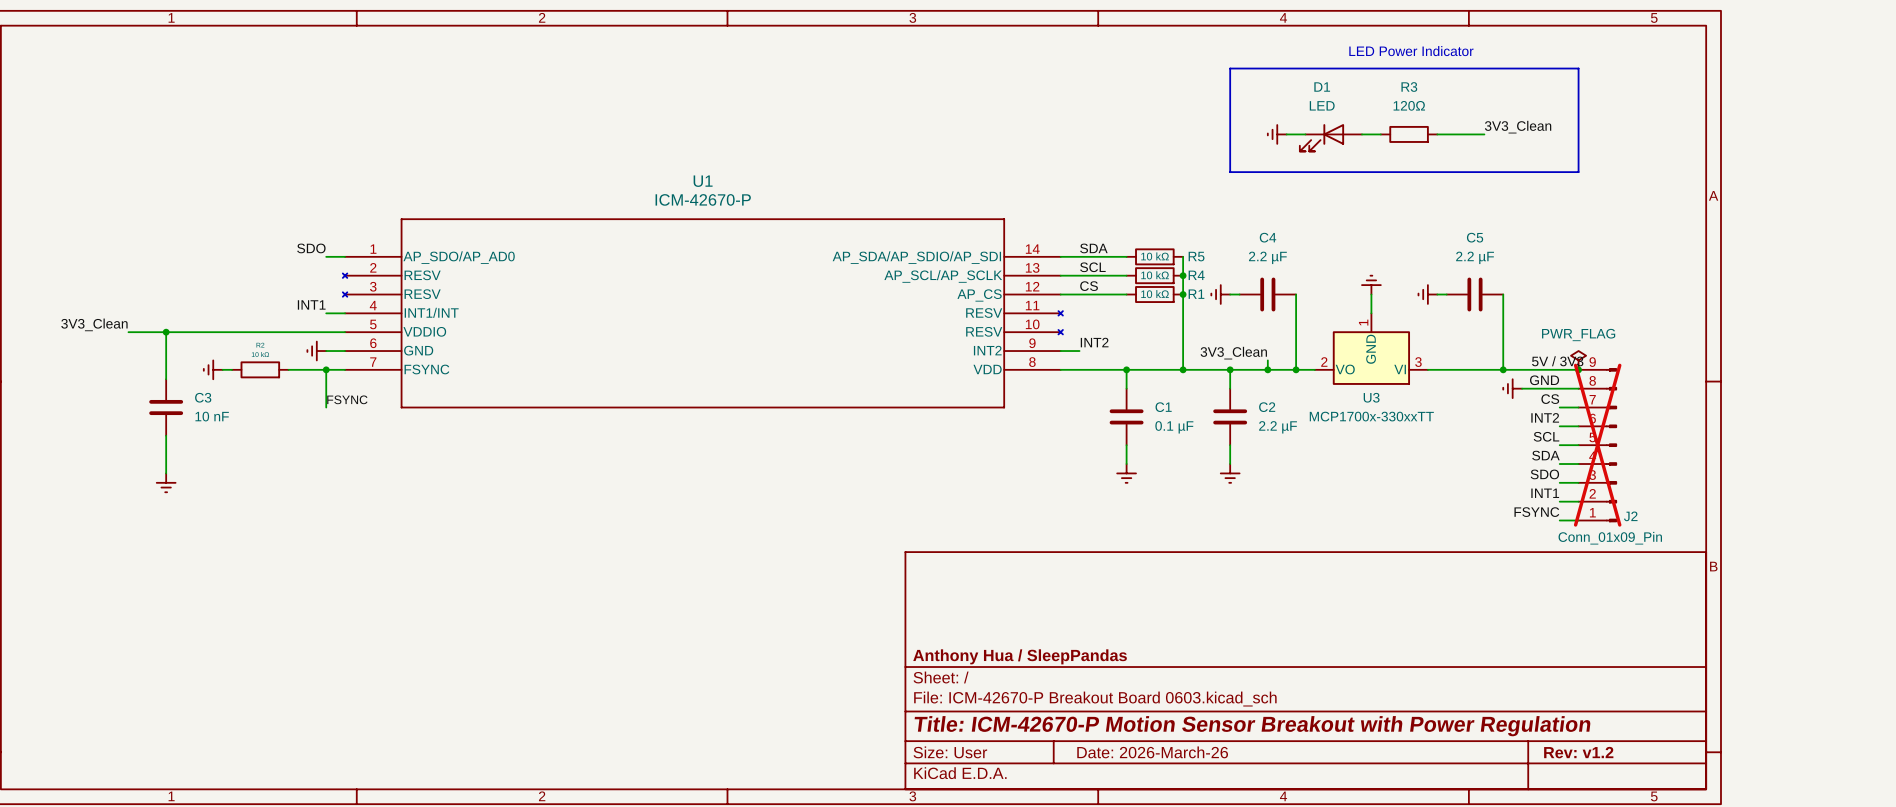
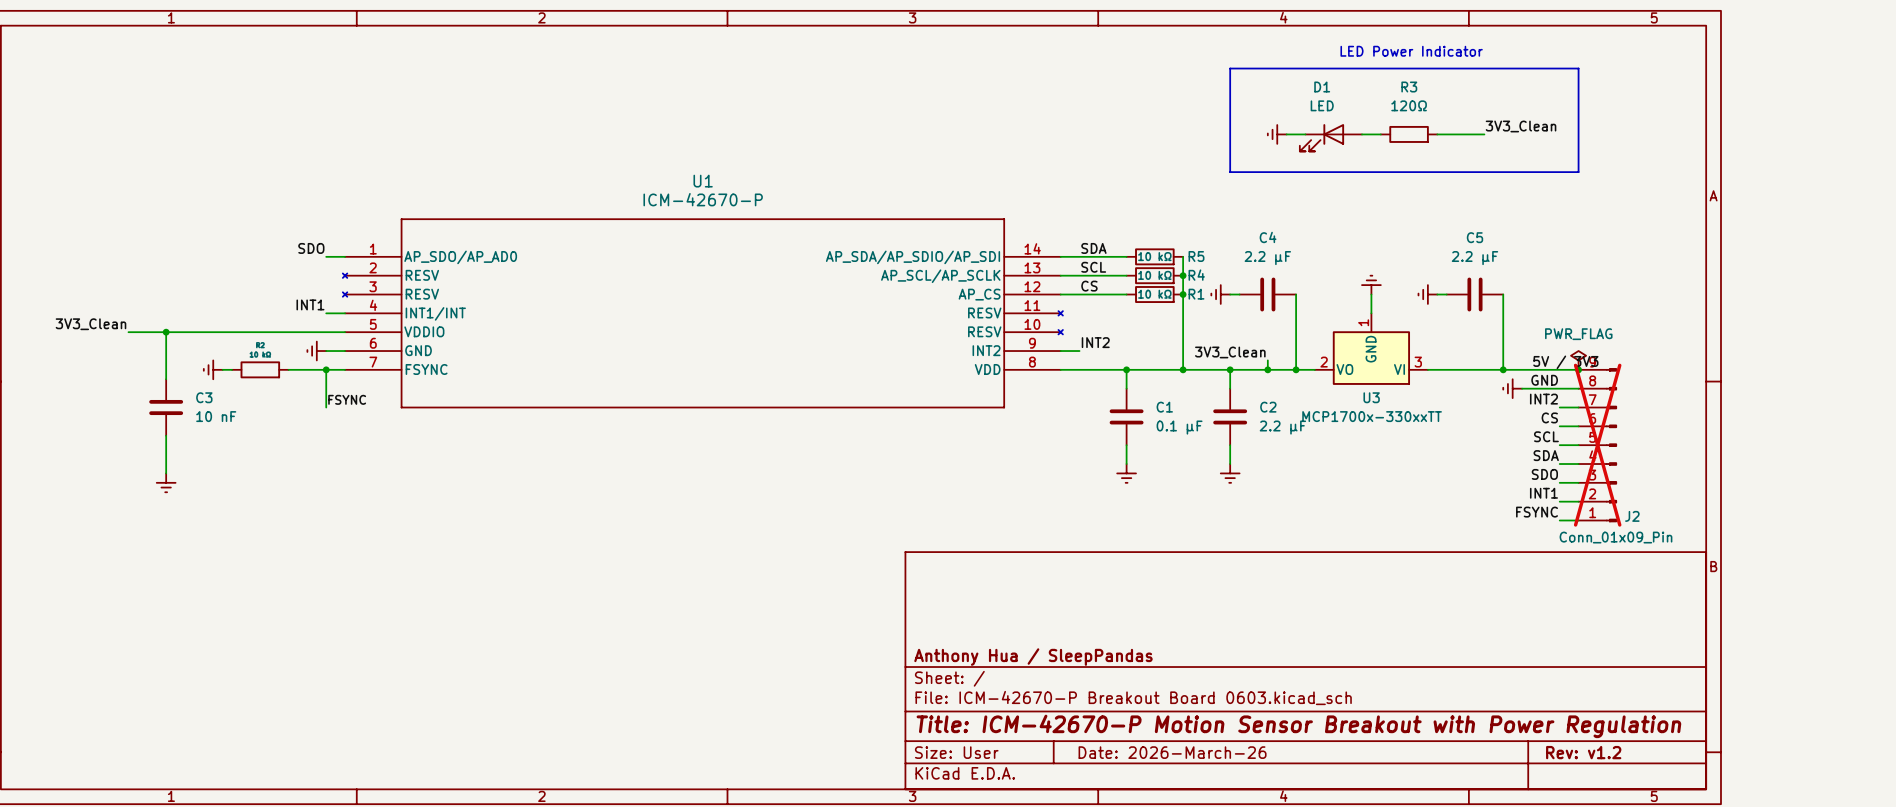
label: CS (1550, 399) -> INT2 (1543, 399)
label: INT2 (1545, 417) -> CS (1549, 417)

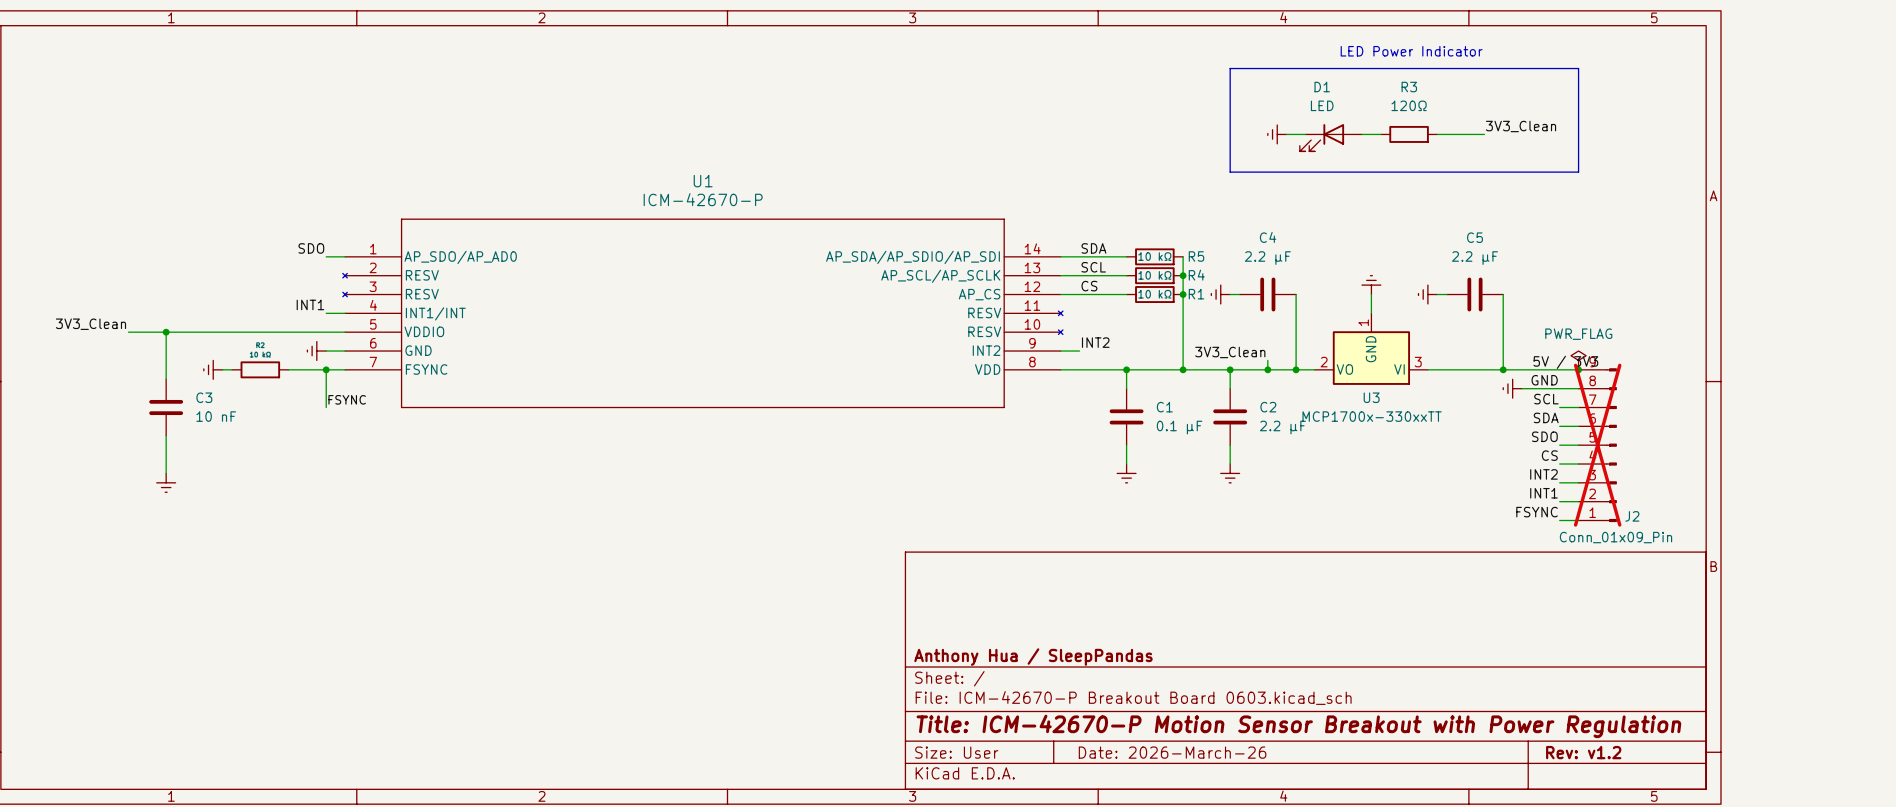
label: INT2 (1543, 399) -> SCL (1546, 399)
label: CS (1549, 417) -> SDA (1546, 417)
label: SCL (1546, 436) -> SDO (1544, 436)
label: SDA (1546, 455) -> CS (1549, 455)
label: SDO (1544, 474) -> INT2 (1543, 474)

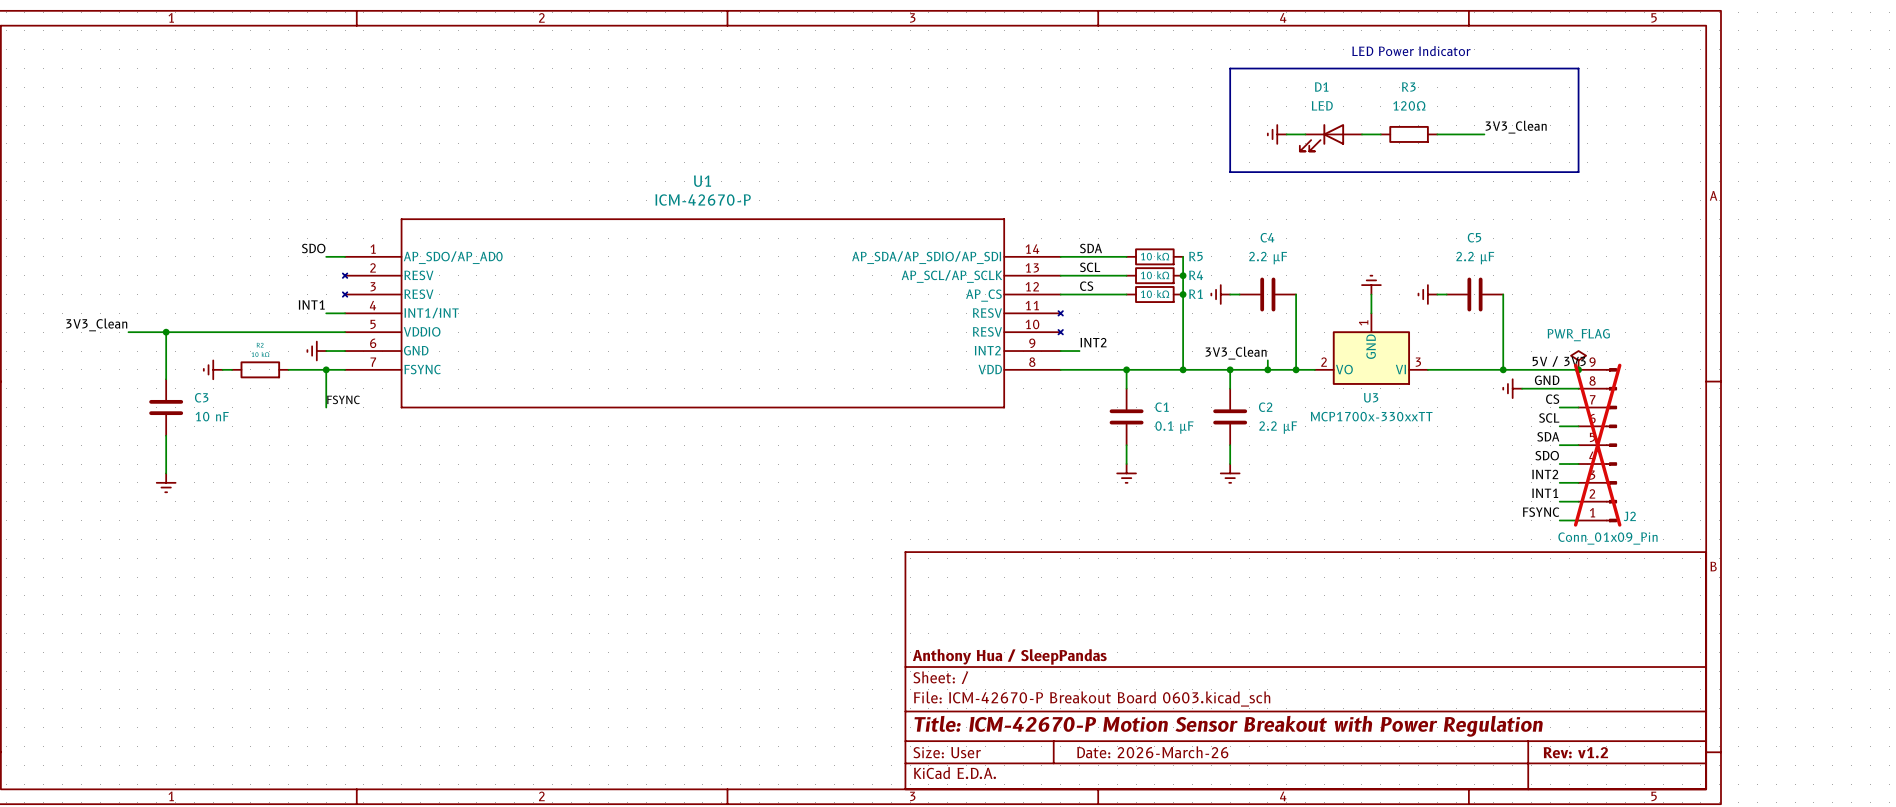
label: SCL (1546, 399) -> CS (1552, 399)
label: SDA (1546, 417) -> SCL (1549, 417)
label: SDO (1544, 436) -> SDA (1548, 436)
label: CS (1549, 455) -> SDO (1547, 455)

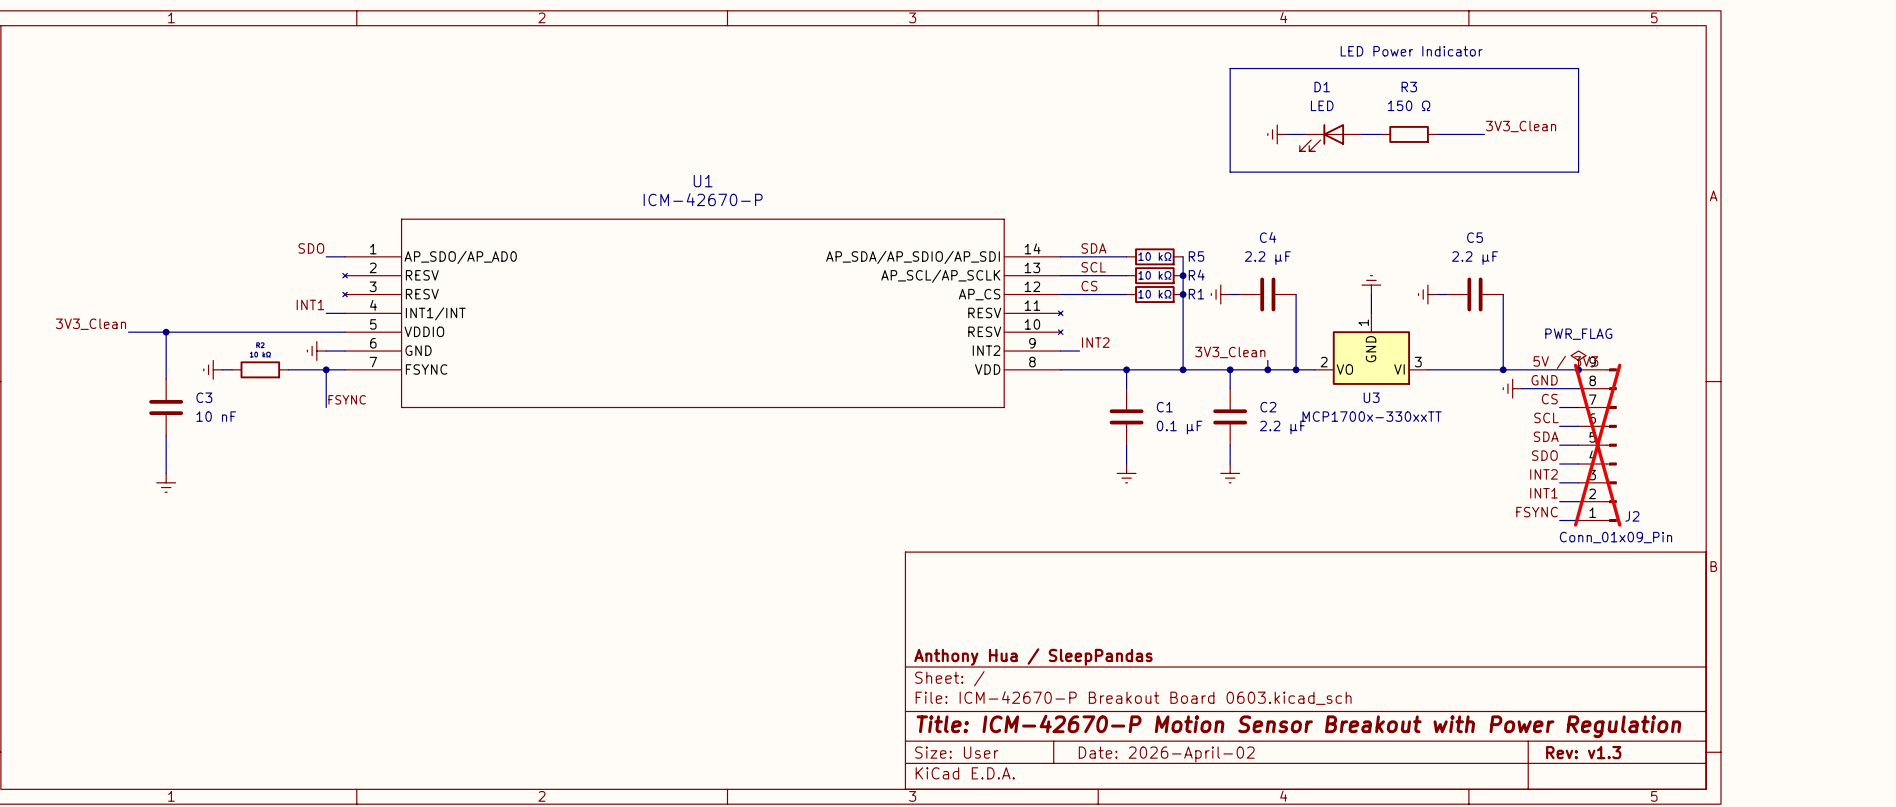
R3 value: 120Ω (1409, 105) -> 150 Ω (1409, 105)
title block: Date: 2026-March-26 (1152, 752) -> Date: 2026-April-02 (1166, 754)
title block: Rev: v1.2 (1575, 752) -> Rev: v1.3 (1583, 752)

